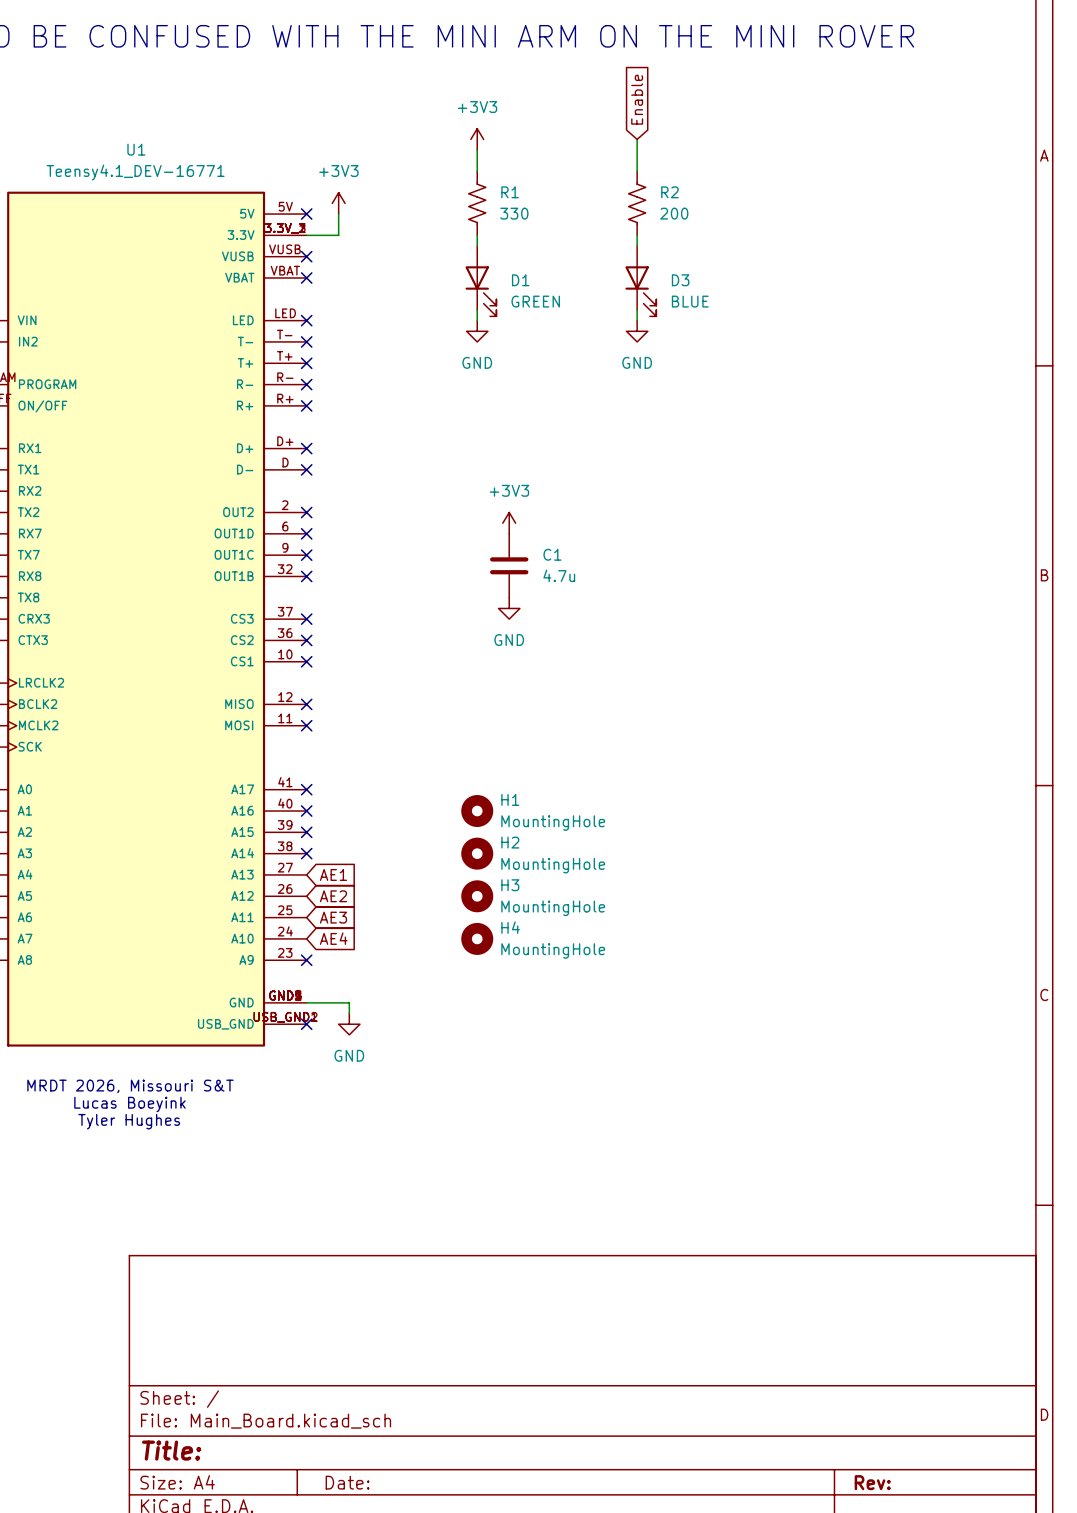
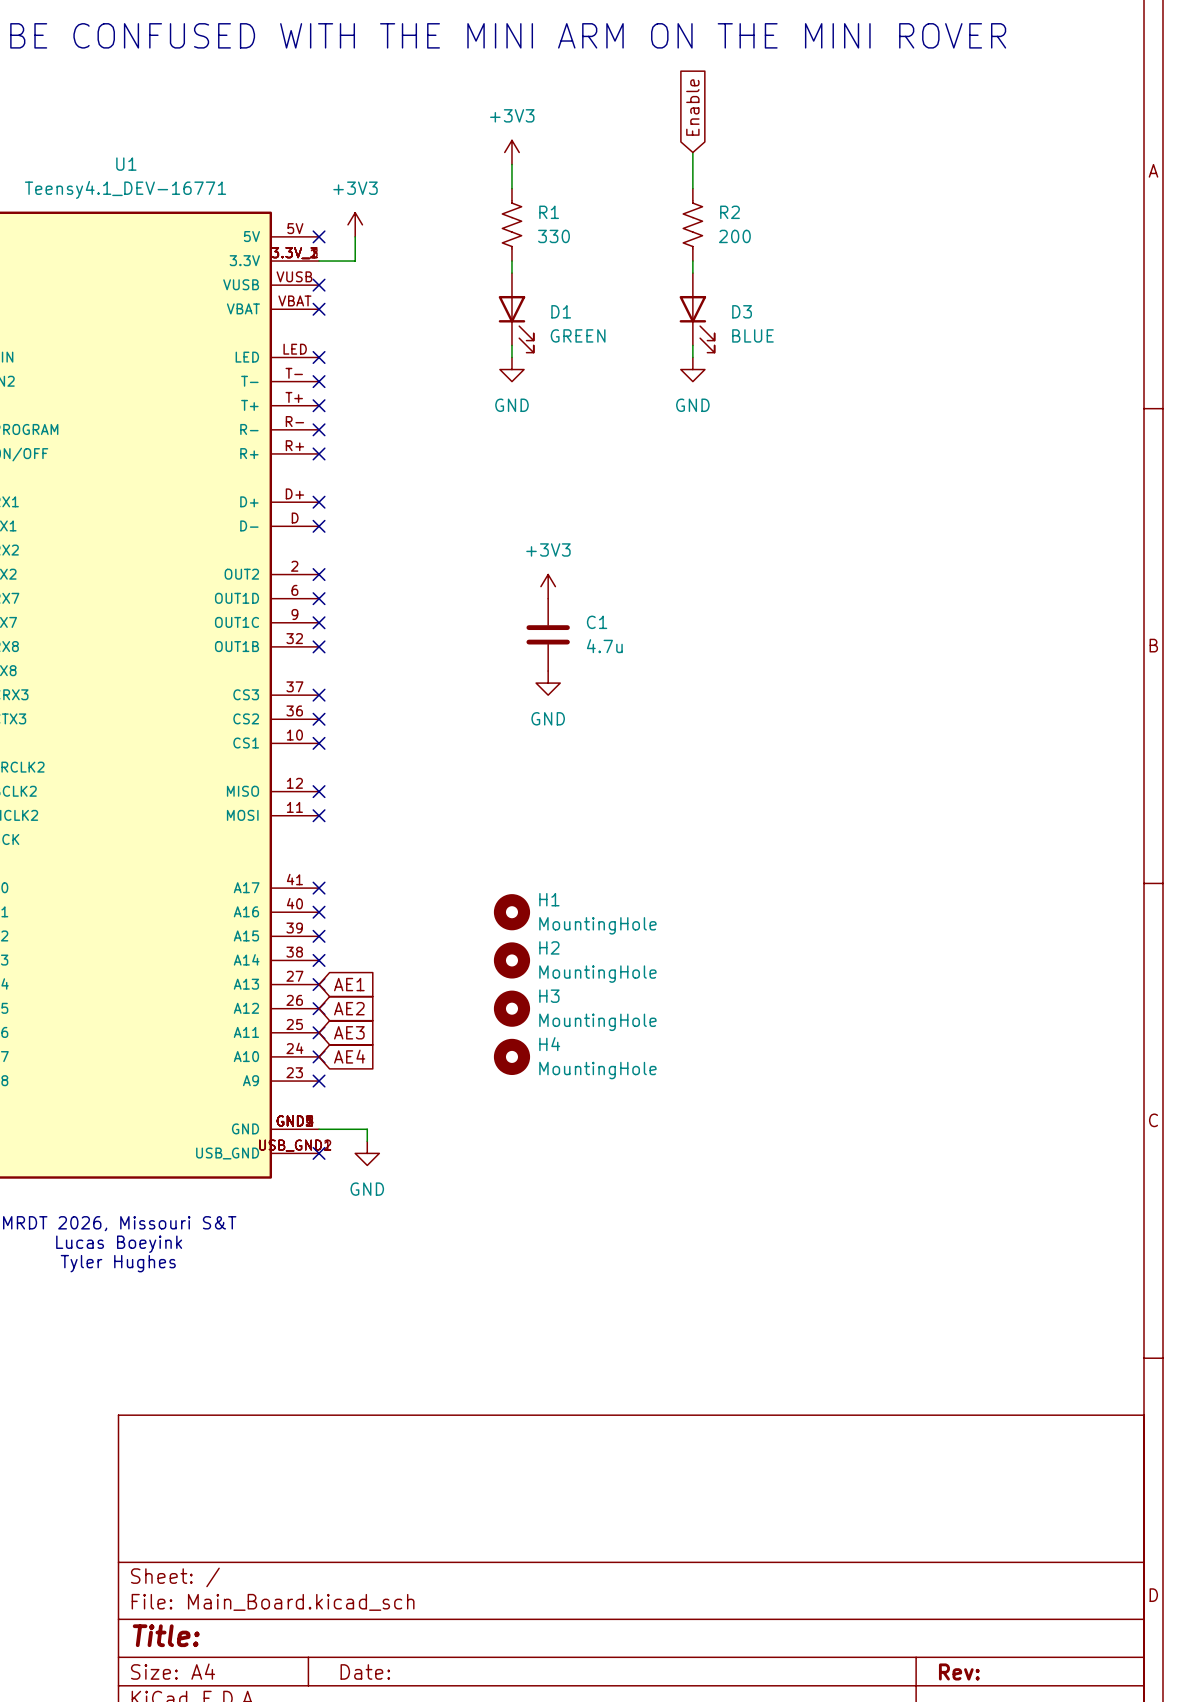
no-connect mark: none -> (319, 984)
no-connect mark: none -> (319, 1008)
no-connect mark: none -> (319, 1032)
no-connect mark: none -> (319, 1056)

